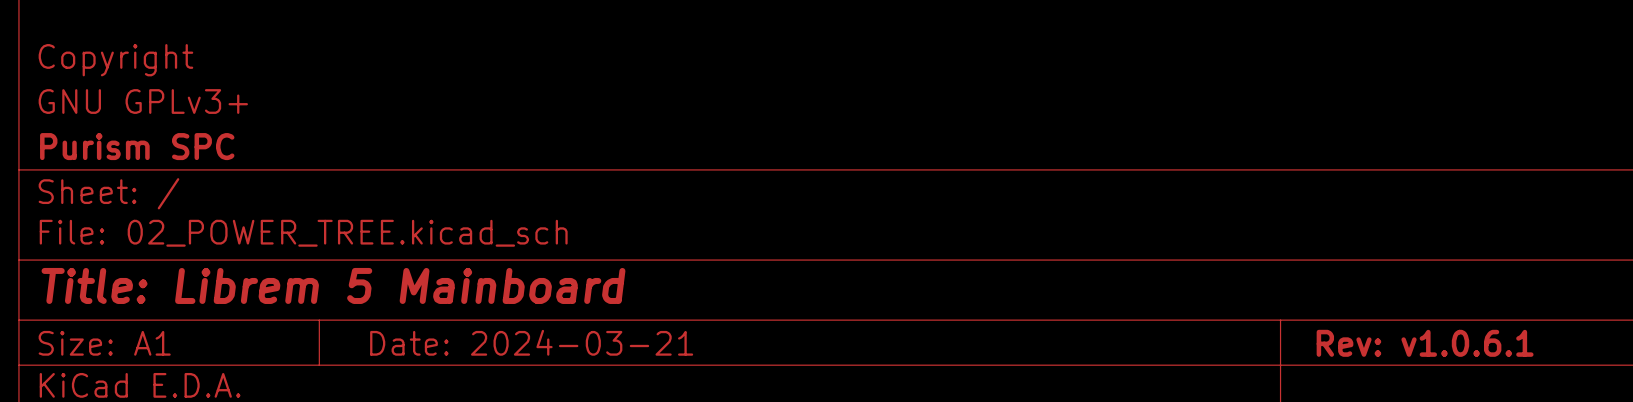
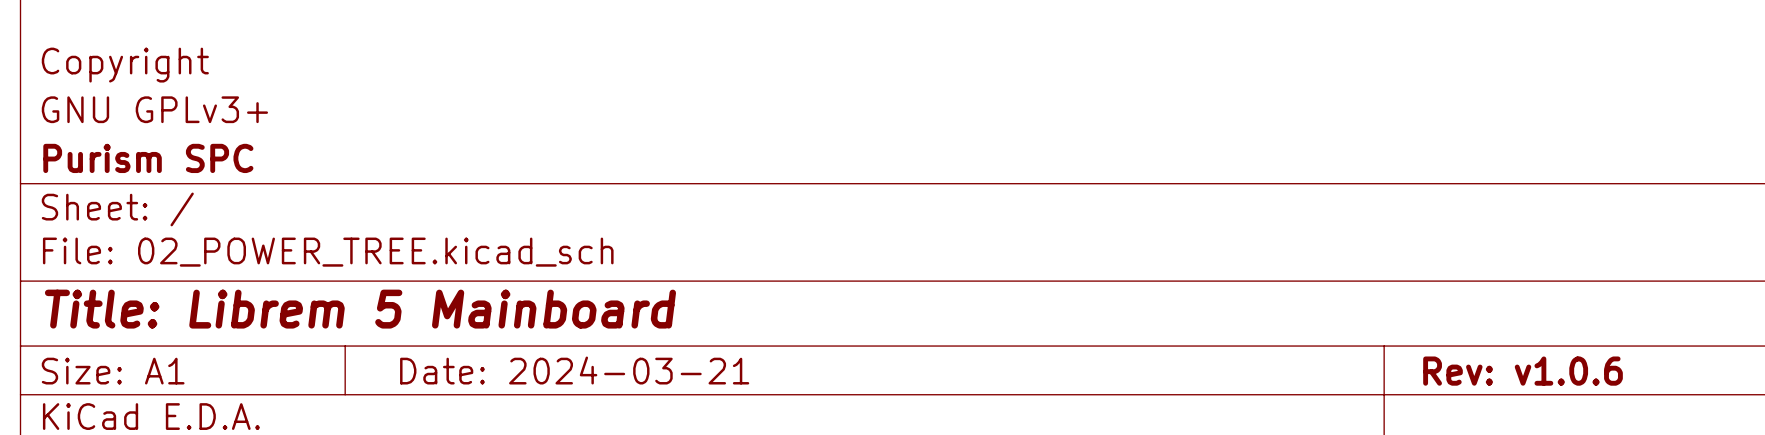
title block: Rev: v1.0.6.1 (1425, 343) -> Rev: v1.0.6 (1523, 371)

